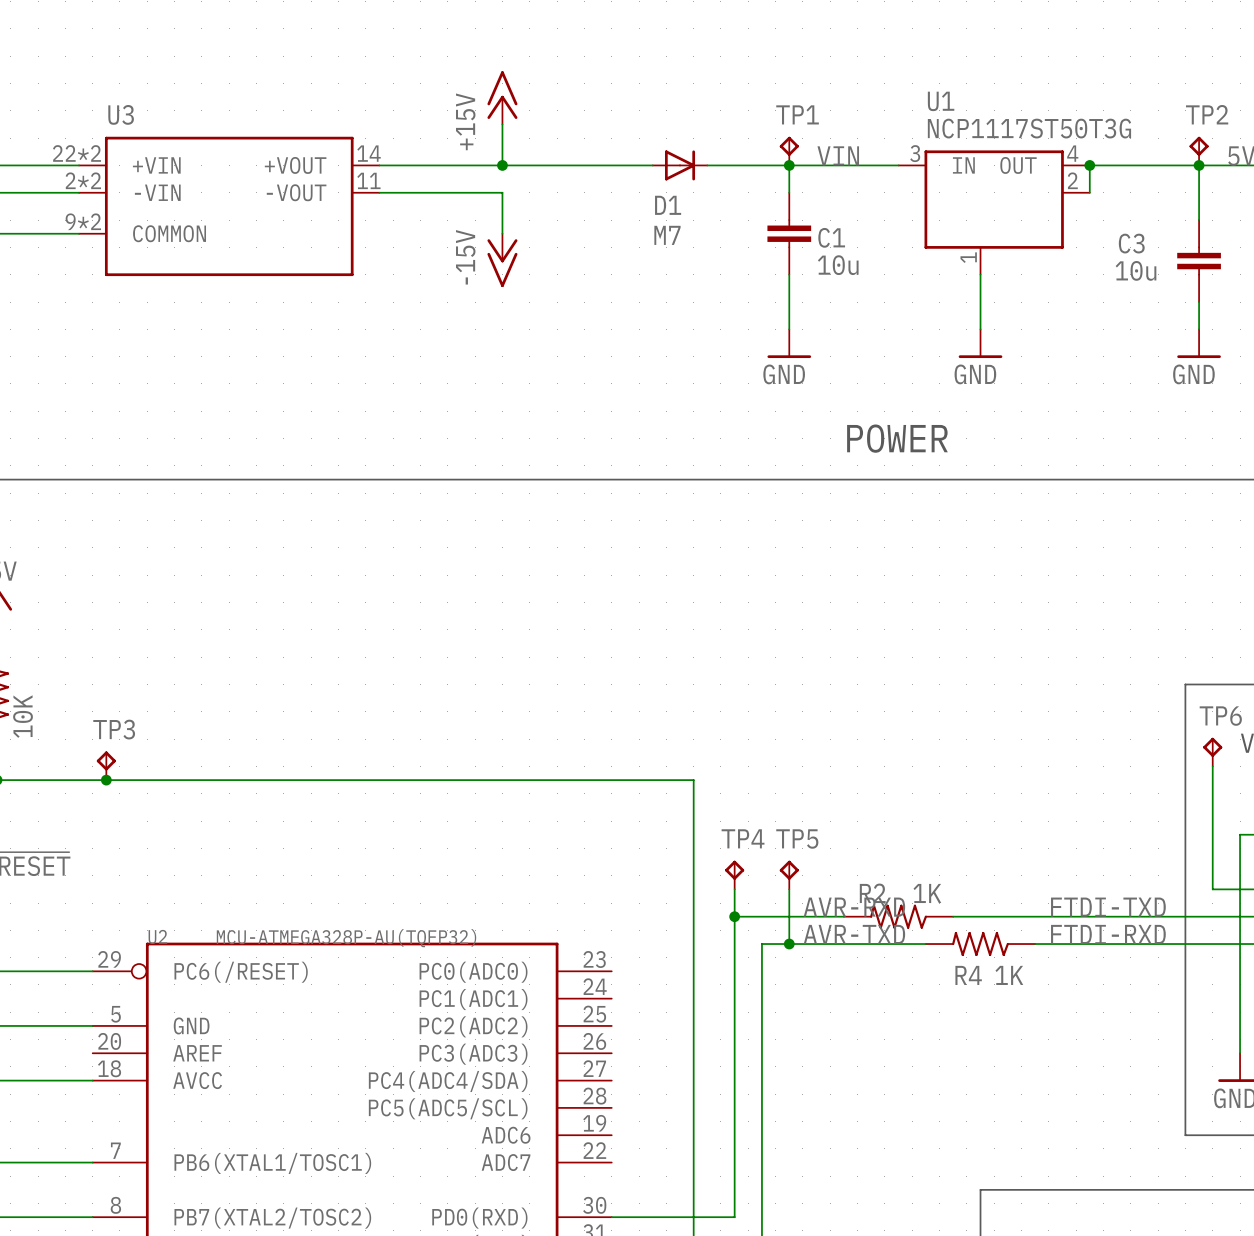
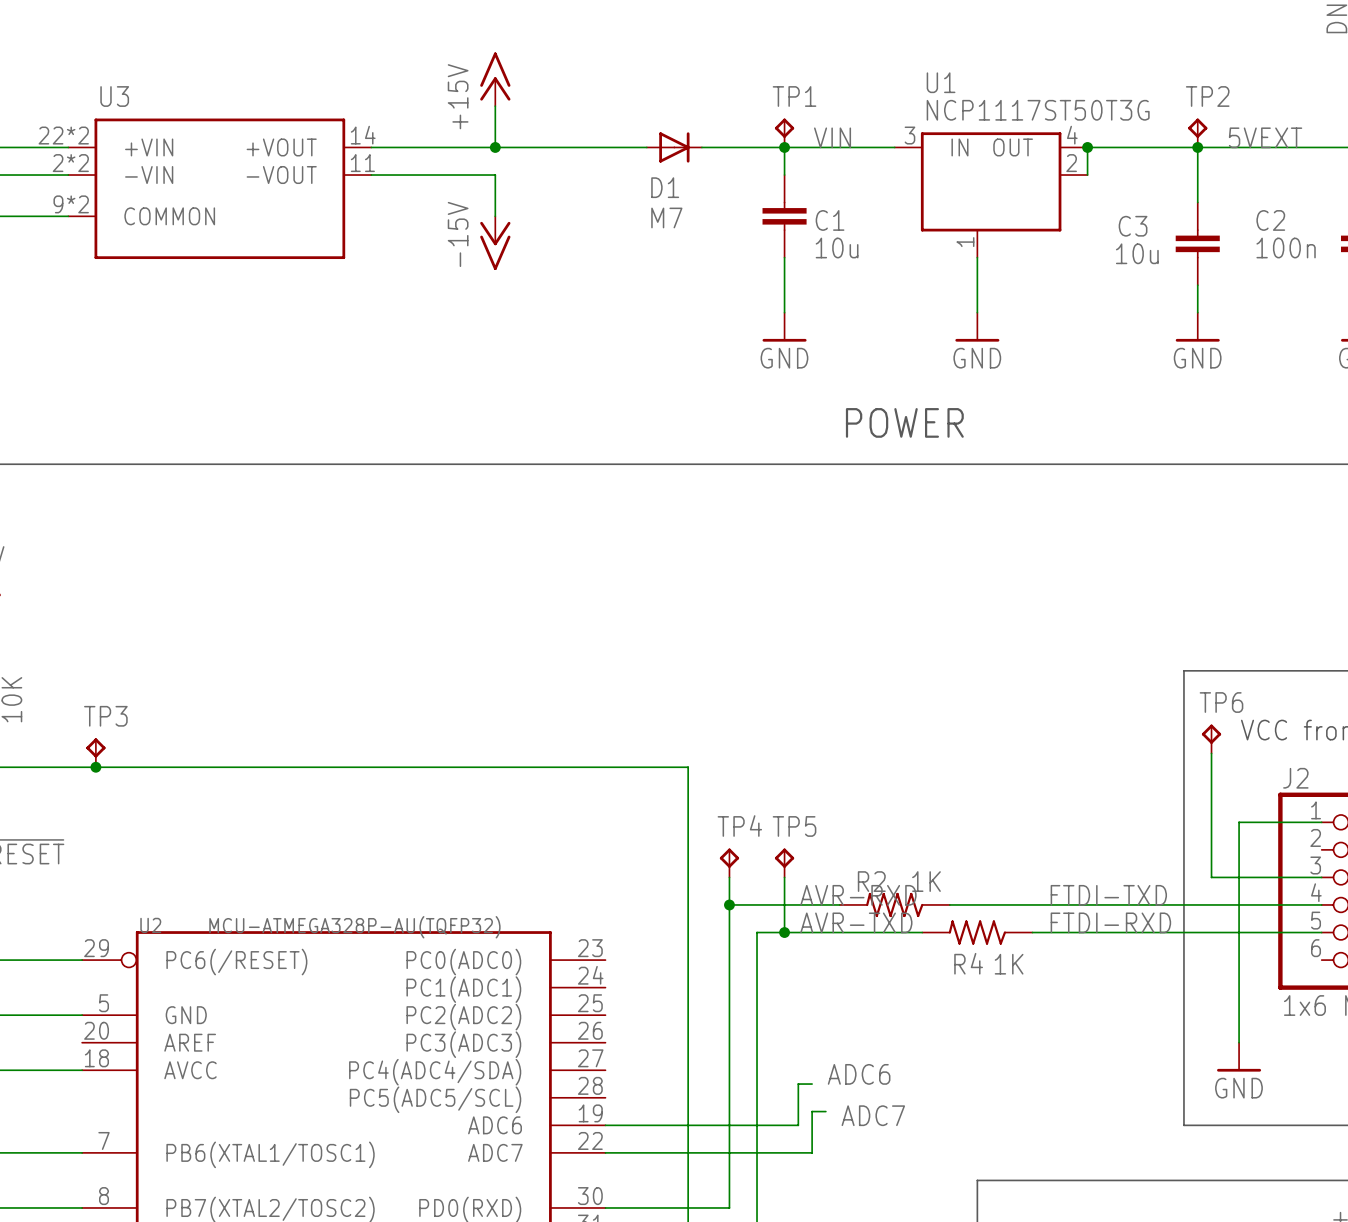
label: none -> ADC6 (859, 1074)
wire: none -> (812, 1084) (798, 1084) (798, 1125) (605, 1125)
wire: none -> (825, 1111) (812, 1111) (812, 1152) (605, 1152)
label: none -> ADC7 (873, 1115)

